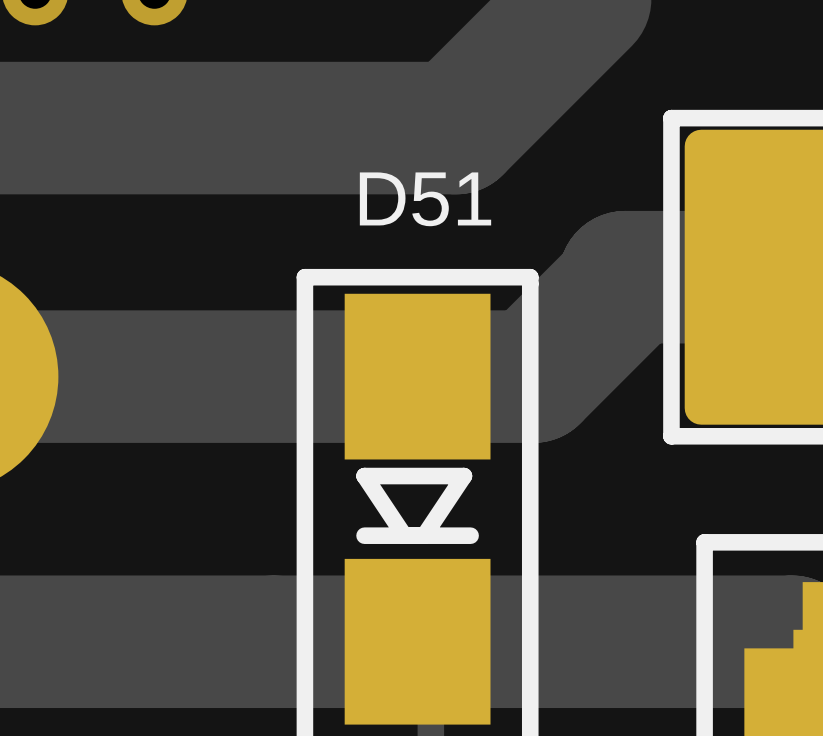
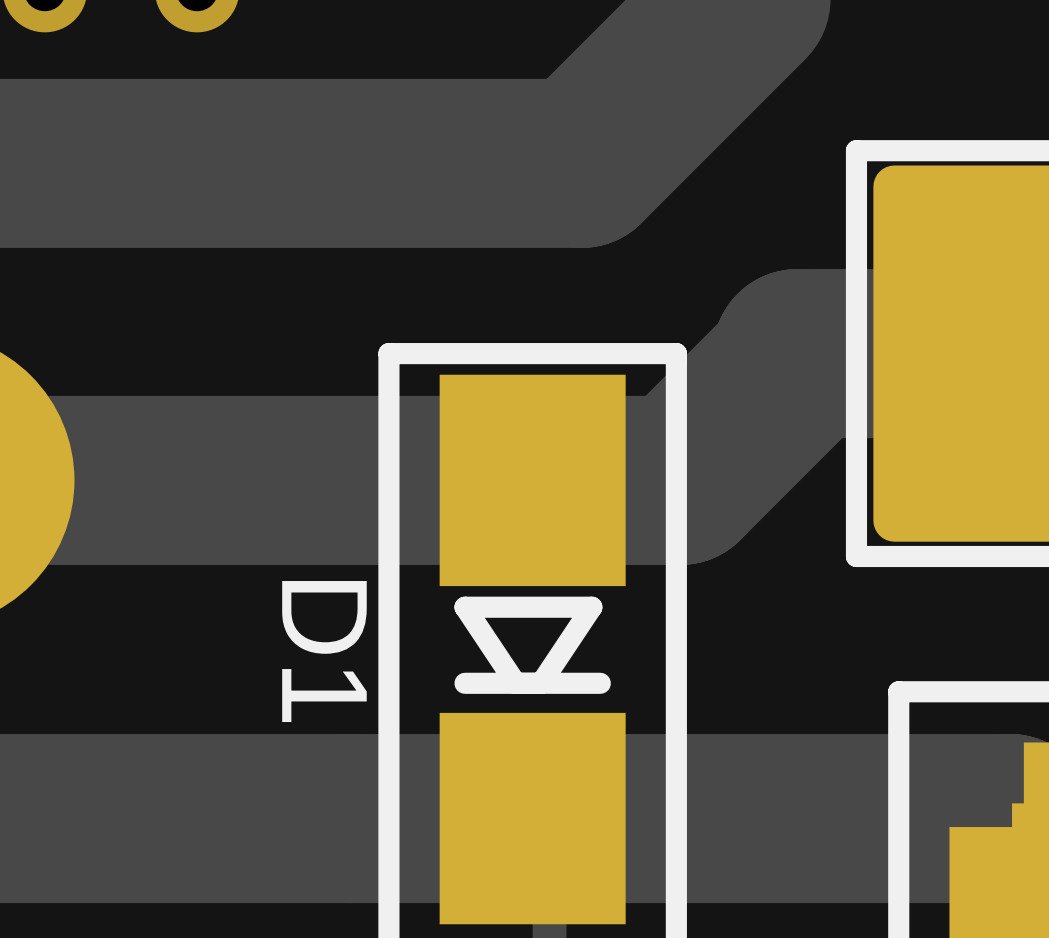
D51 name: D51 (425, 199) -> D1 (324, 651)

